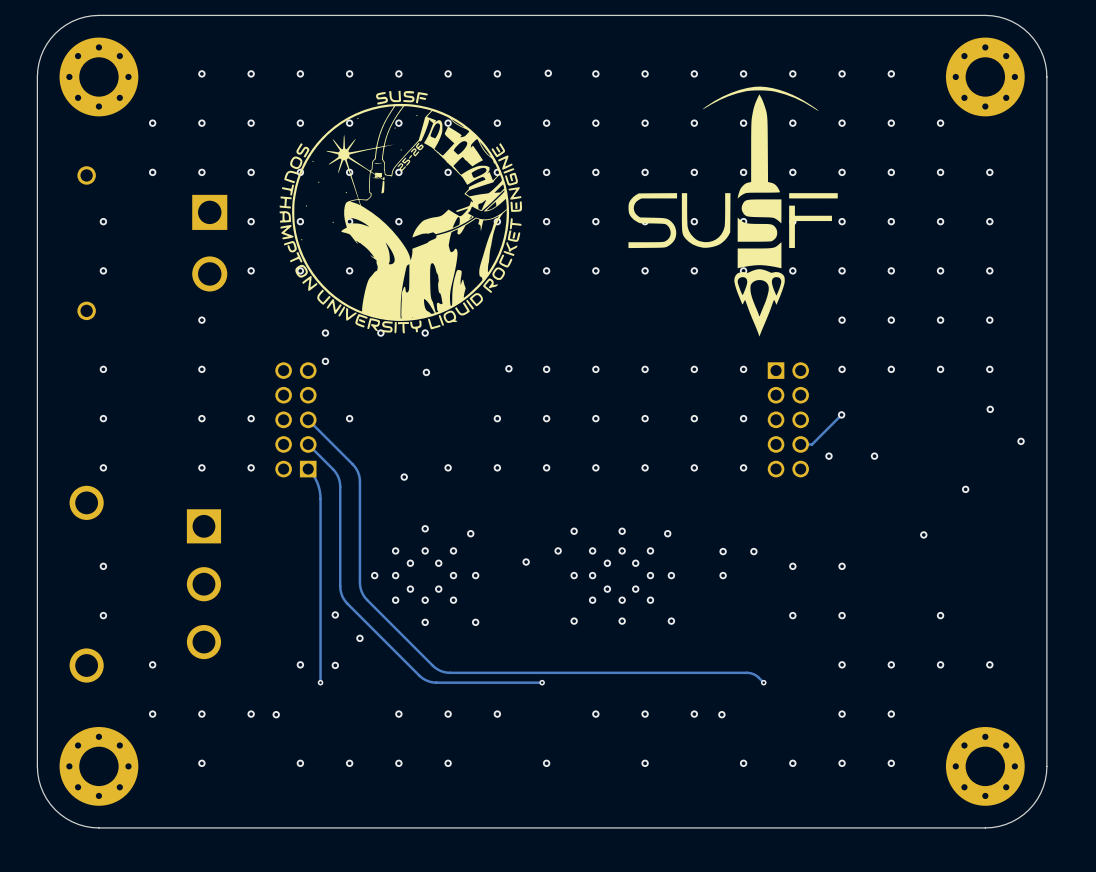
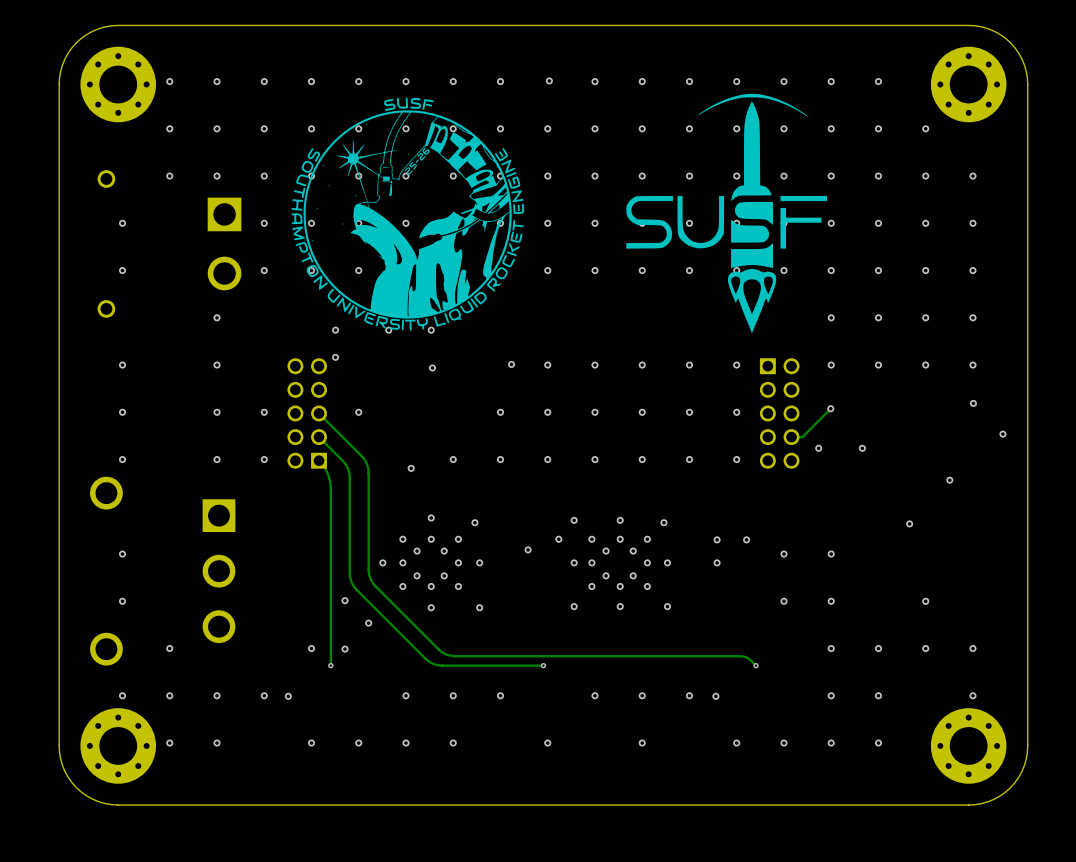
via: none -> (169, 81)
via: none -> (122, 695)
via: none -> (972, 695)
via: none -> (169, 743)

